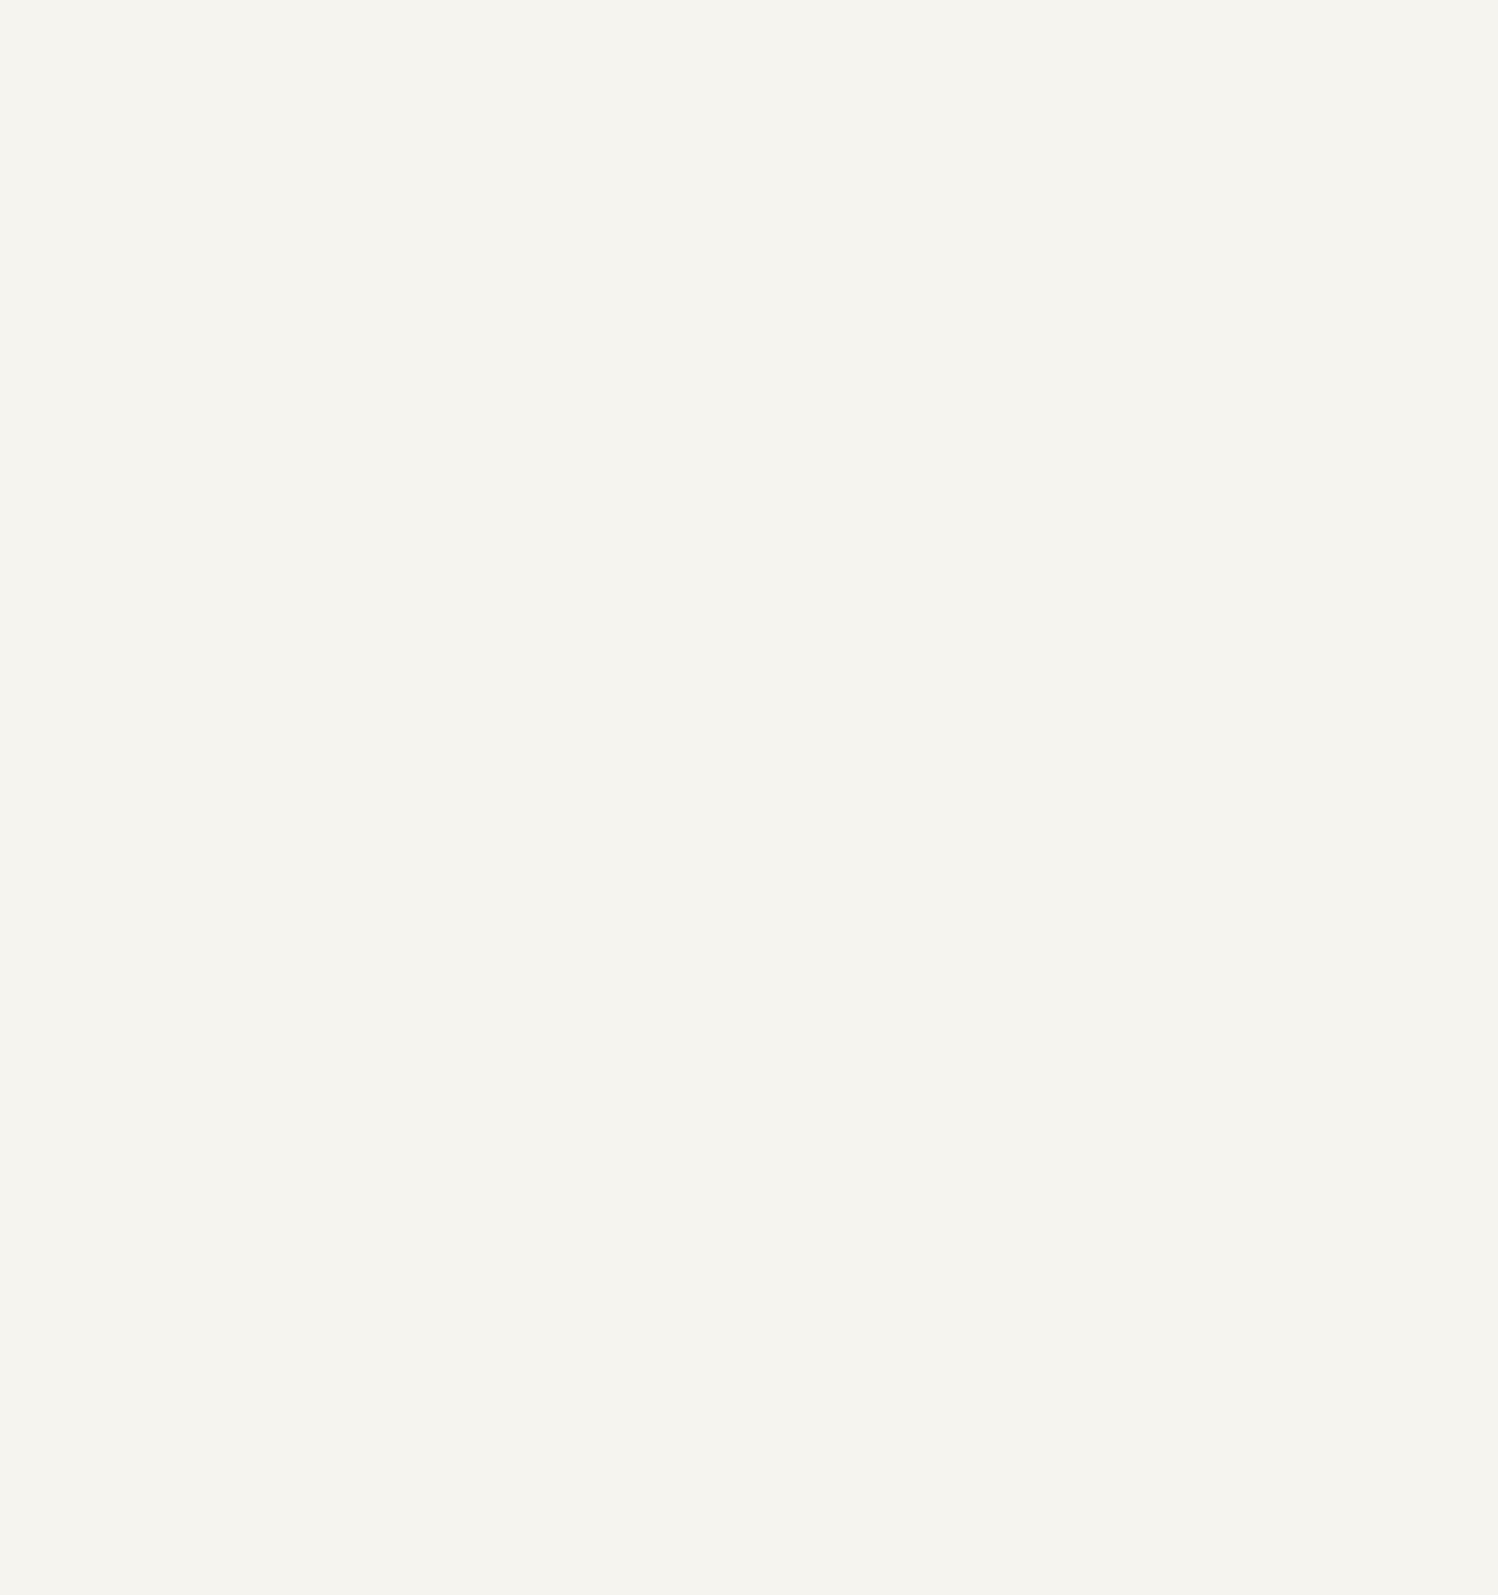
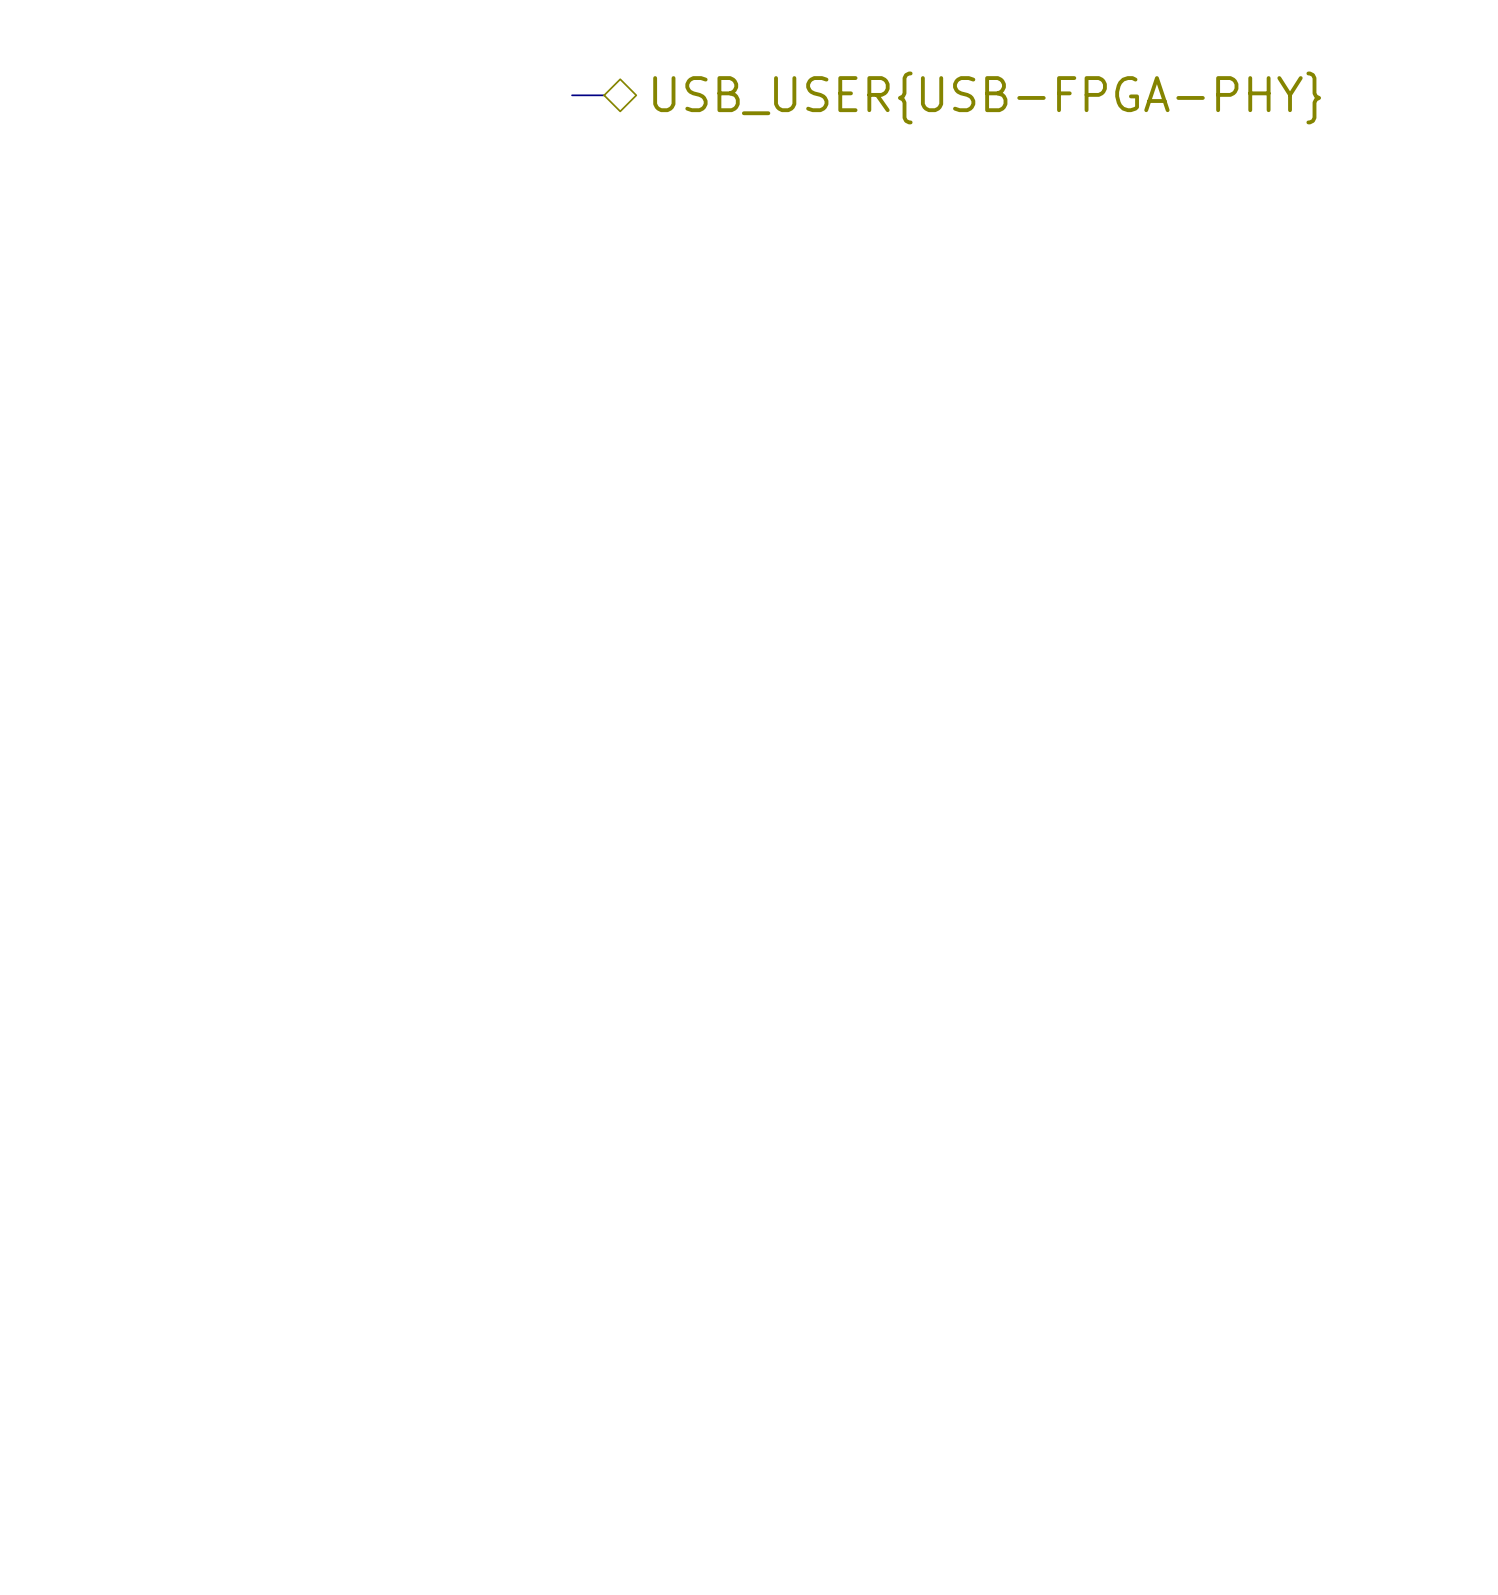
bus: none -> (572, 95) (604, 95)
hierarchical label: none -> USB_USER{USB-FPGA-PHY} (987, 97)

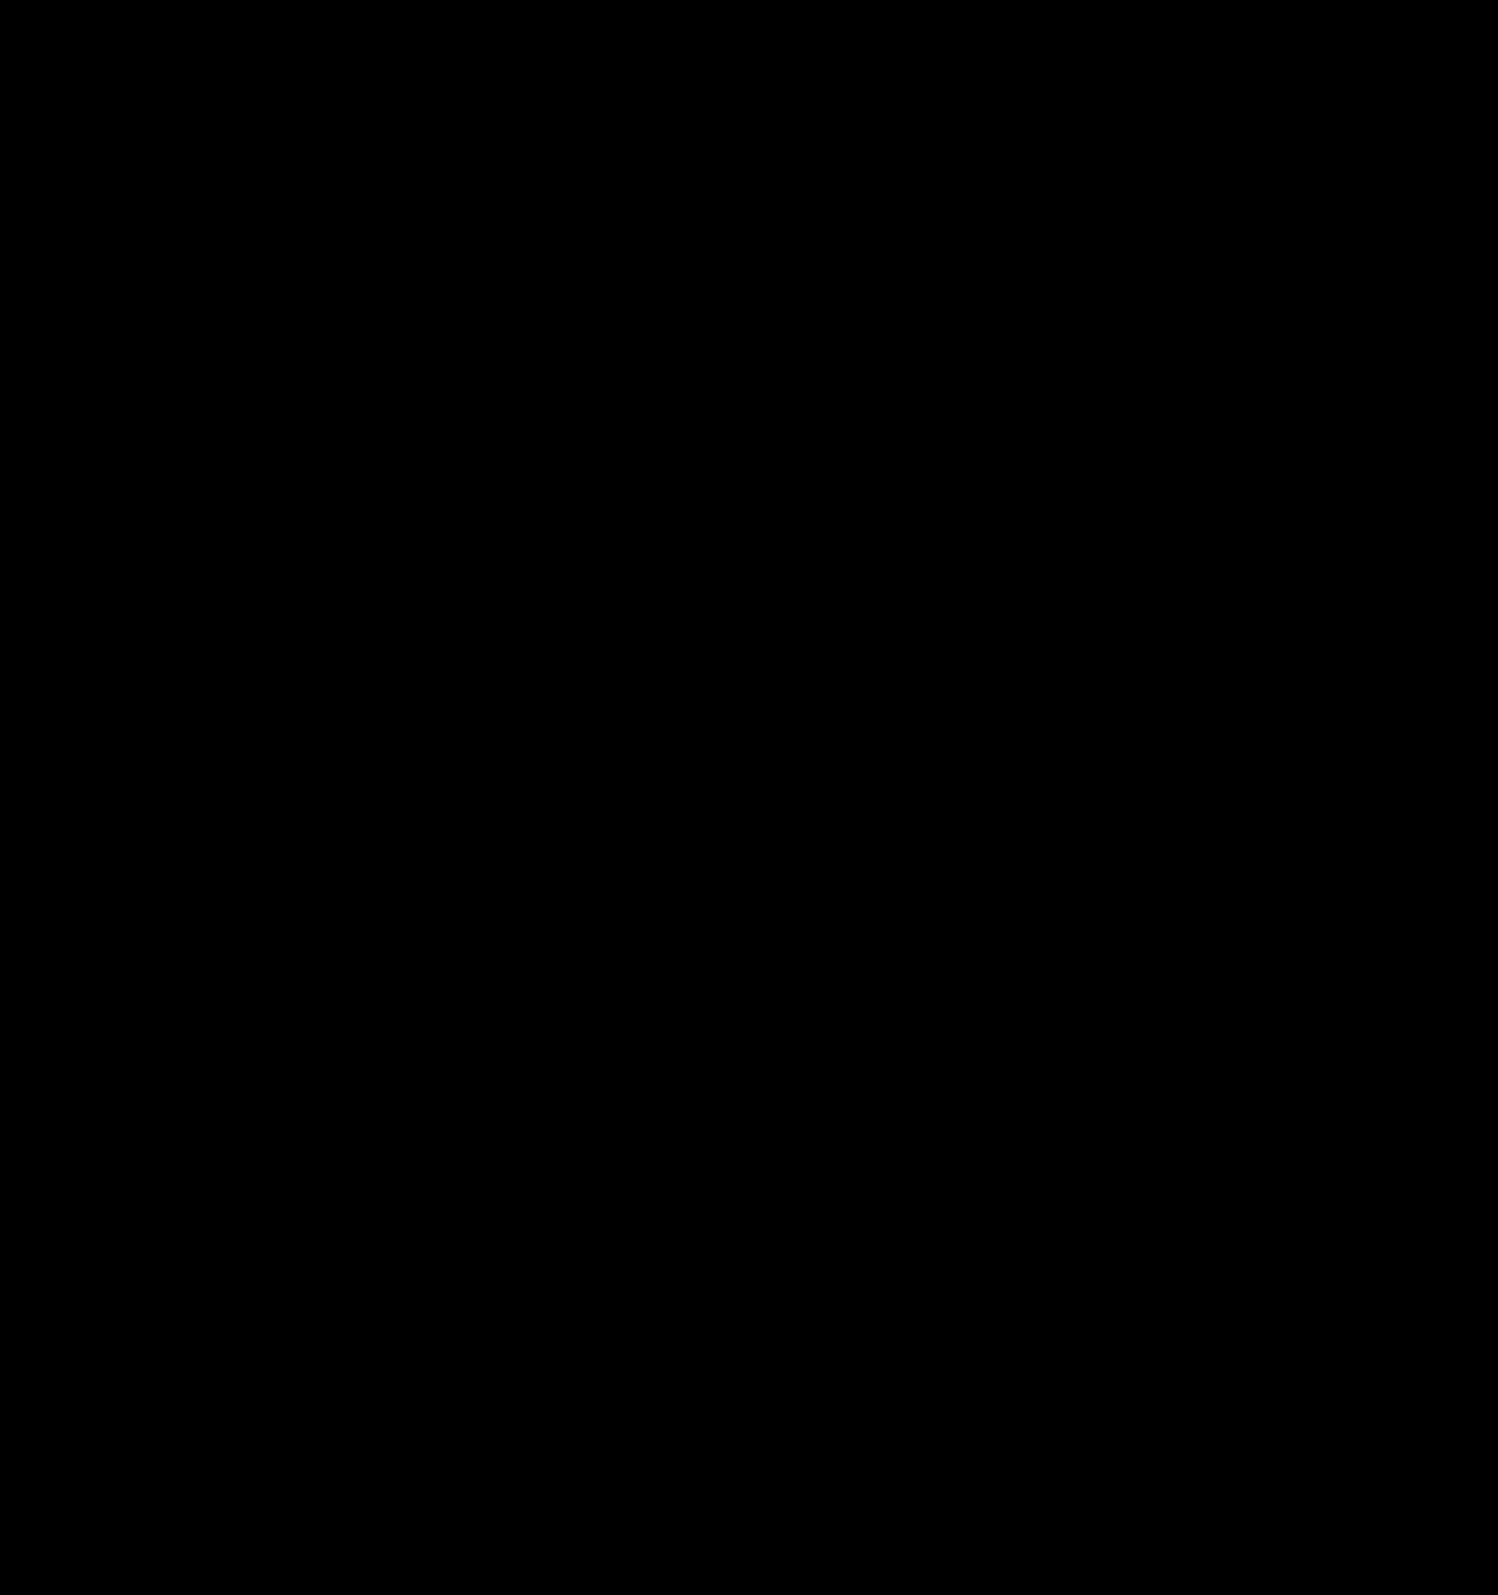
bus: (572, 95) (604, 95) -> none
hierarchical label: USB_USER{USB-FPGA-PHY} (987, 97) -> none

